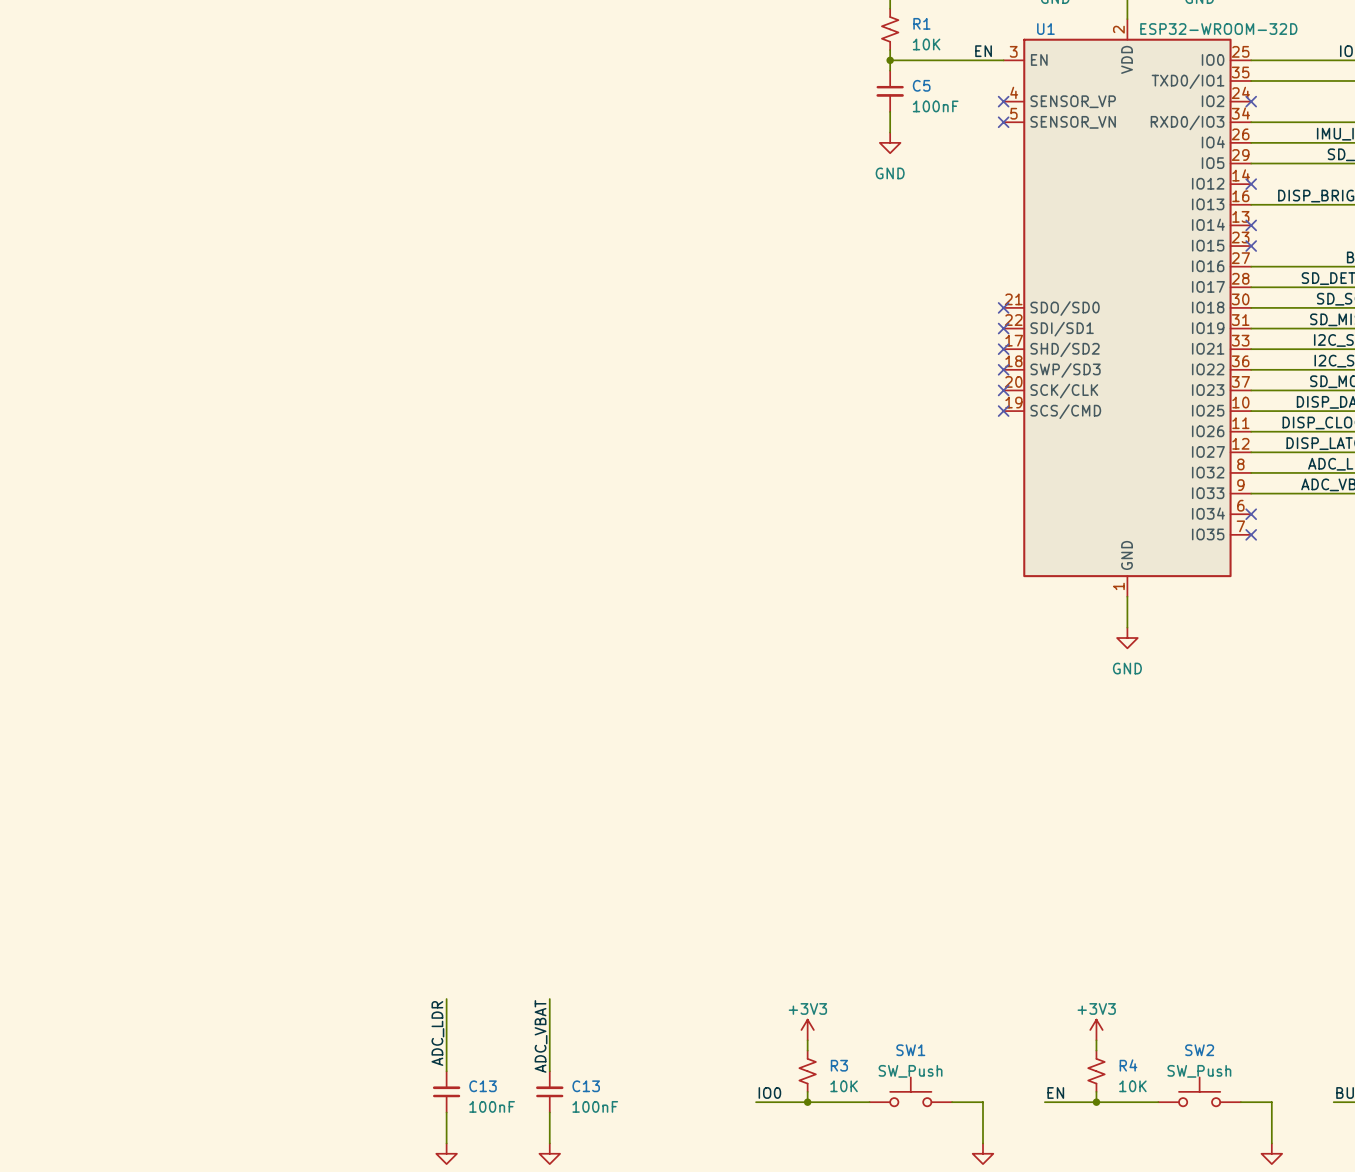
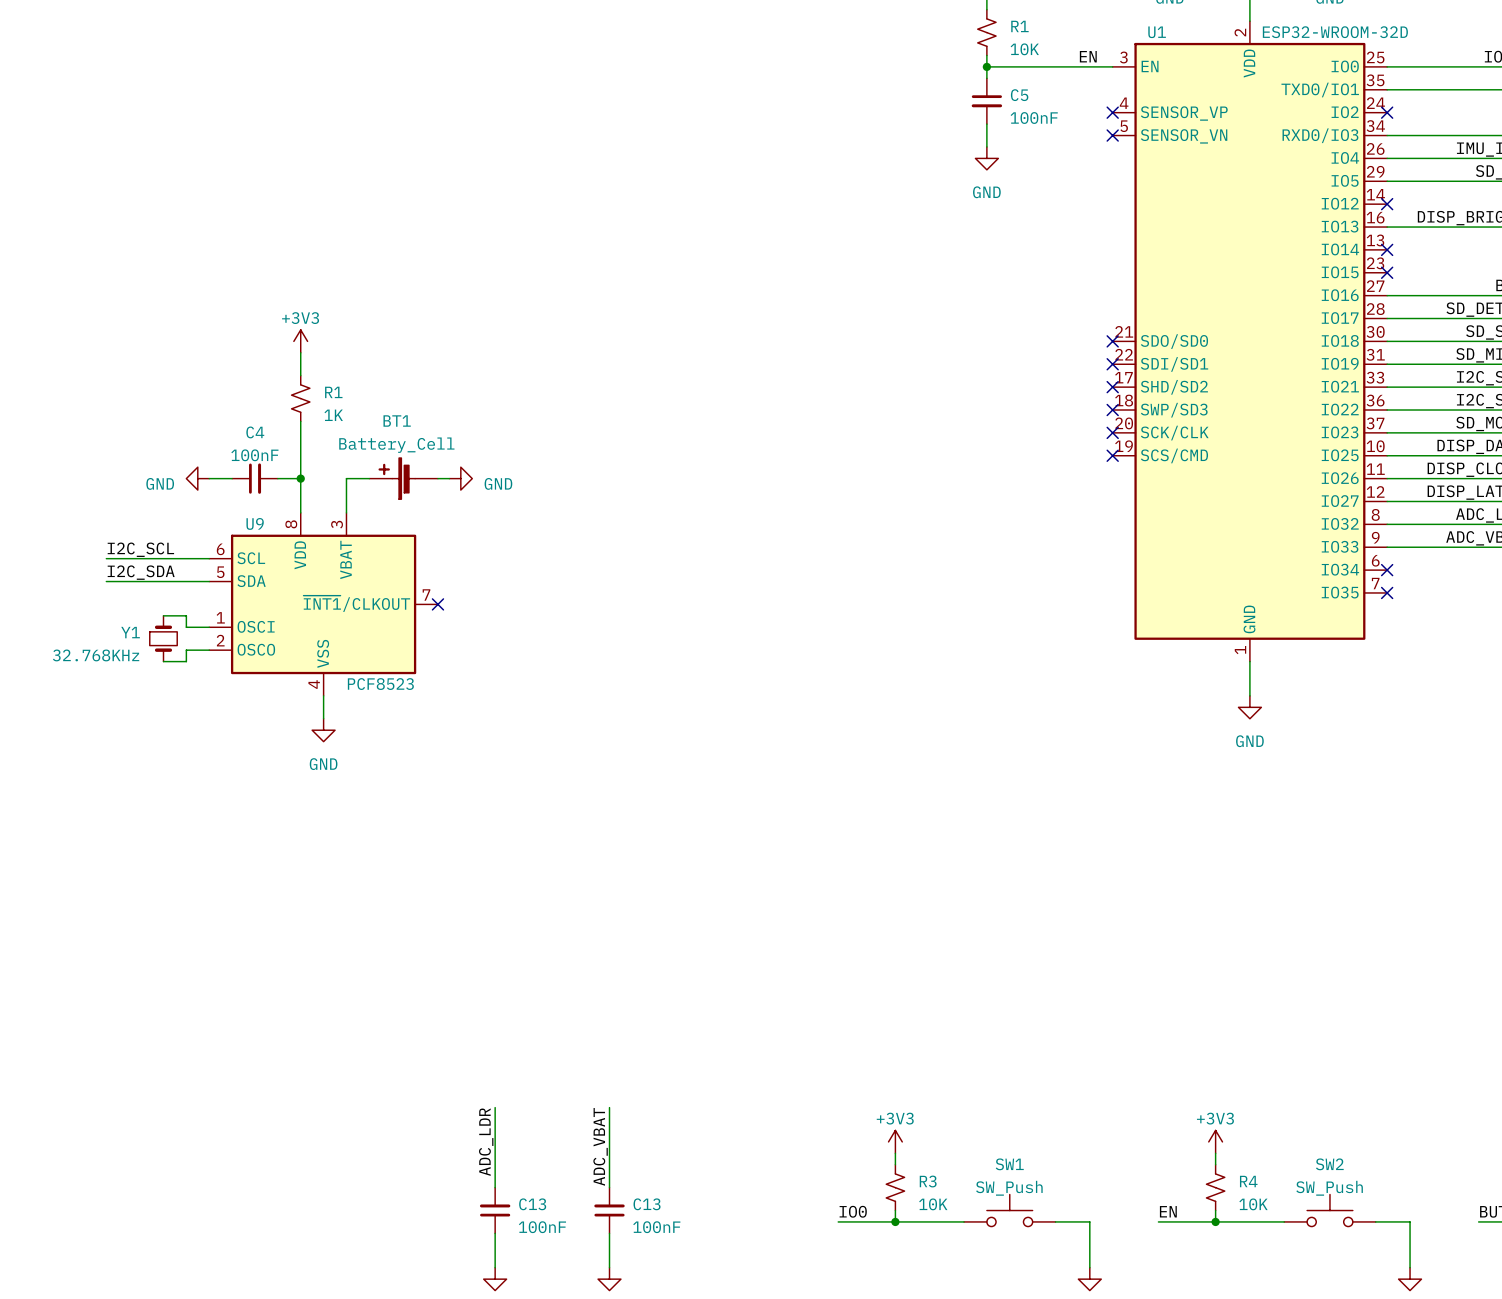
power symbol: none -> +3V3 (300, 341)
wire: none -> (300, 352) (300, 375)
R1: none -> 1K (300, 398)
wire: none -> (300, 421) (300, 512)
power symbol: none -> GND (197, 478)
wire: none -> (209, 478) (232, 478)
C4: none -> 100nF (254, 478)
wire: none -> (277, 478) (300, 478)
junction: none -> (300, 478)
wire: none -> (369, 478) (346, 478) (346, 512)
BT1: none -> Battery_Cell (403, 478)
wire: none -> (437, 478) (449, 478)
power symbol: none -> GND (460, 478)
label: none -> I2C_SCL (140, 549)
wire: none -> (106, 558) (209, 558)
label: none -> I2C_SDA (141, 572)
wire: none -> (106, 581) (209, 581)
U9: none -> PCF8523 (323, 604)
no-connect mark: none -> (437, 604)
wire: none -> (163, 615) (186, 615) (186, 627) (209, 627)
Y1: none -> 32.768KHz (163, 638)
wire: none -> (209, 650) (186, 650) (186, 661) (163, 661)
wire: none -> (323, 695) (323, 718)
power symbol: none -> GND (323, 730)

